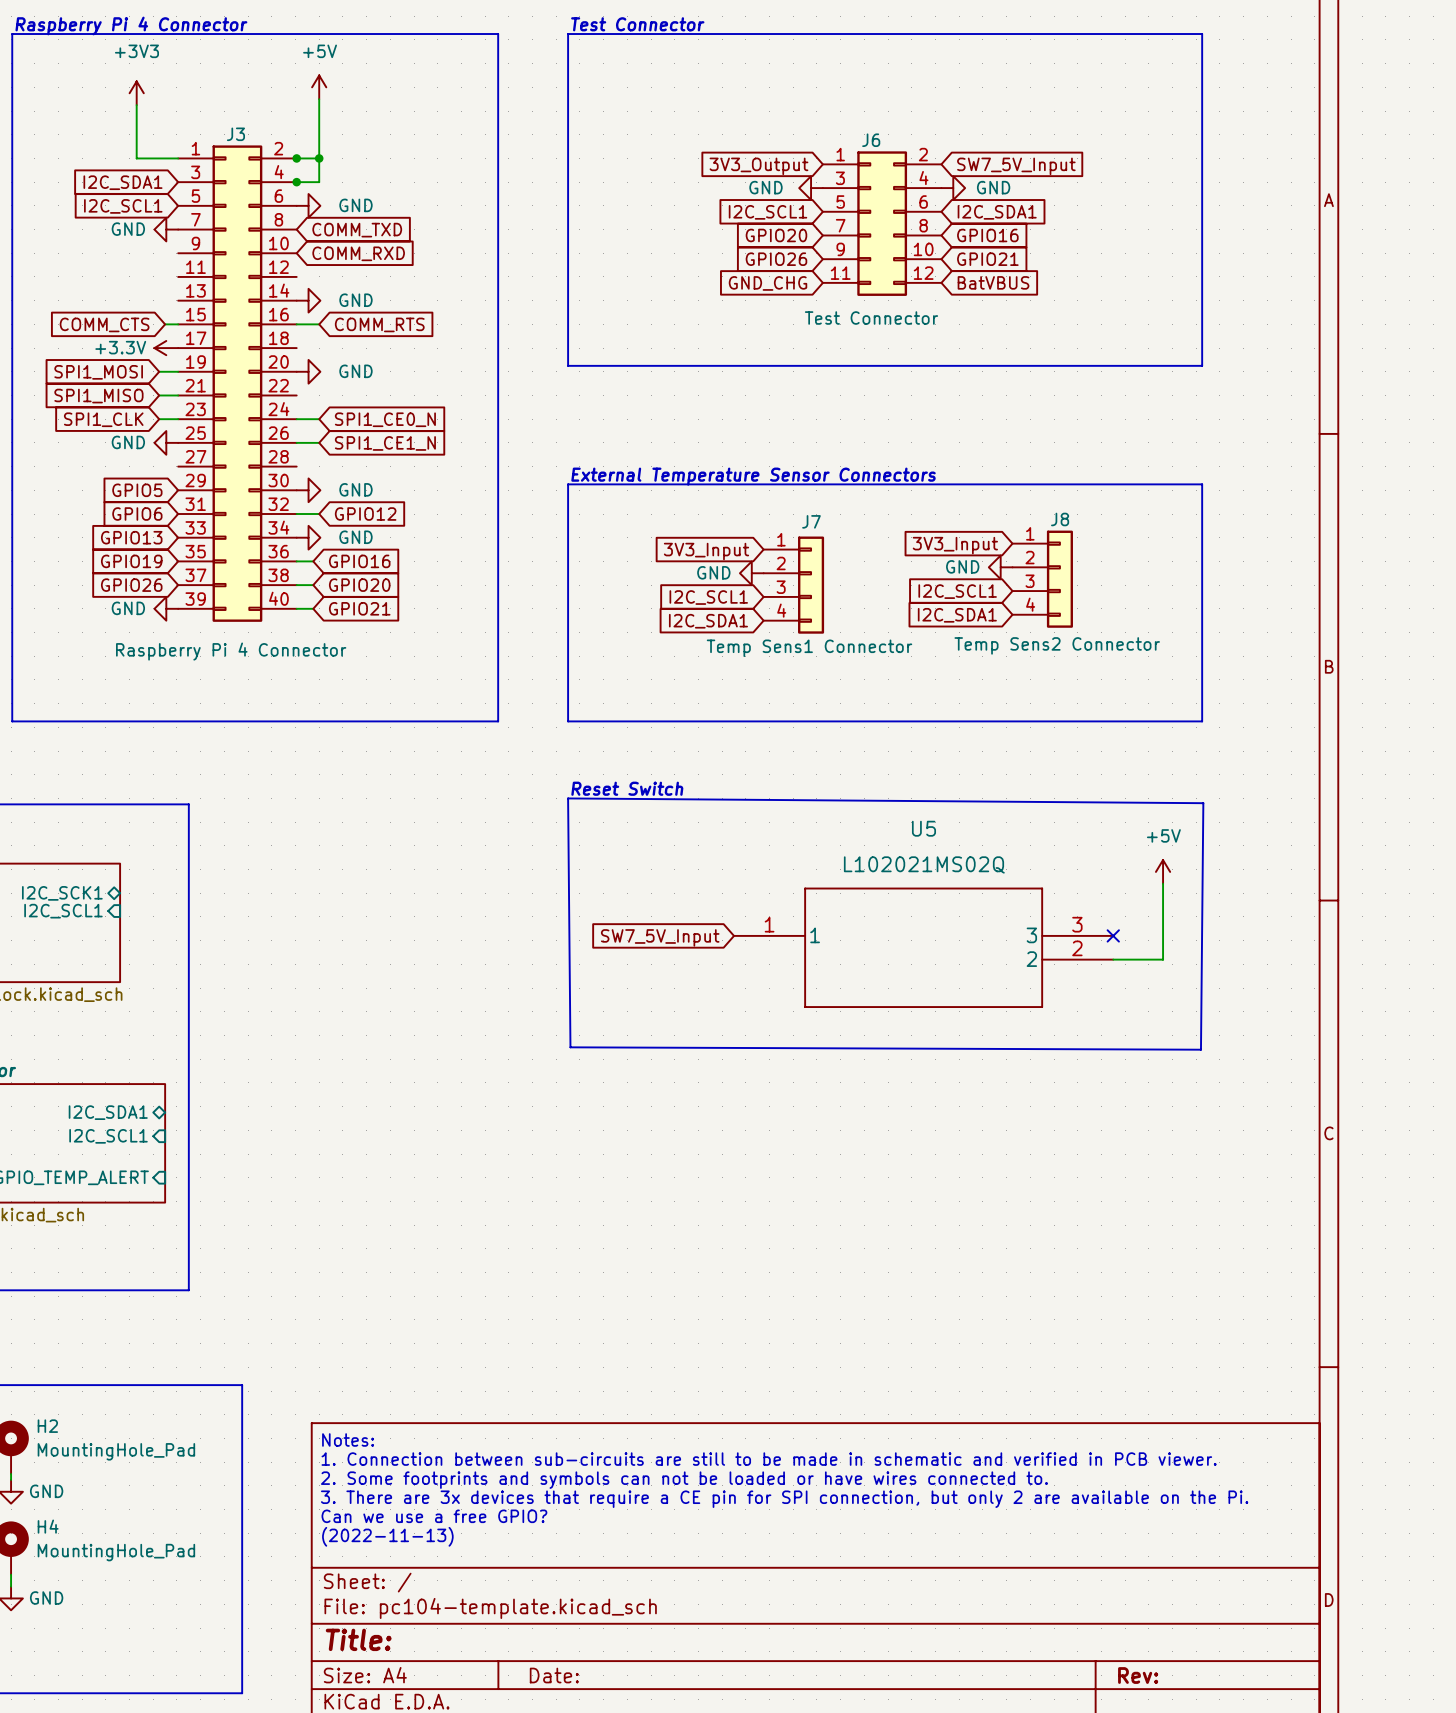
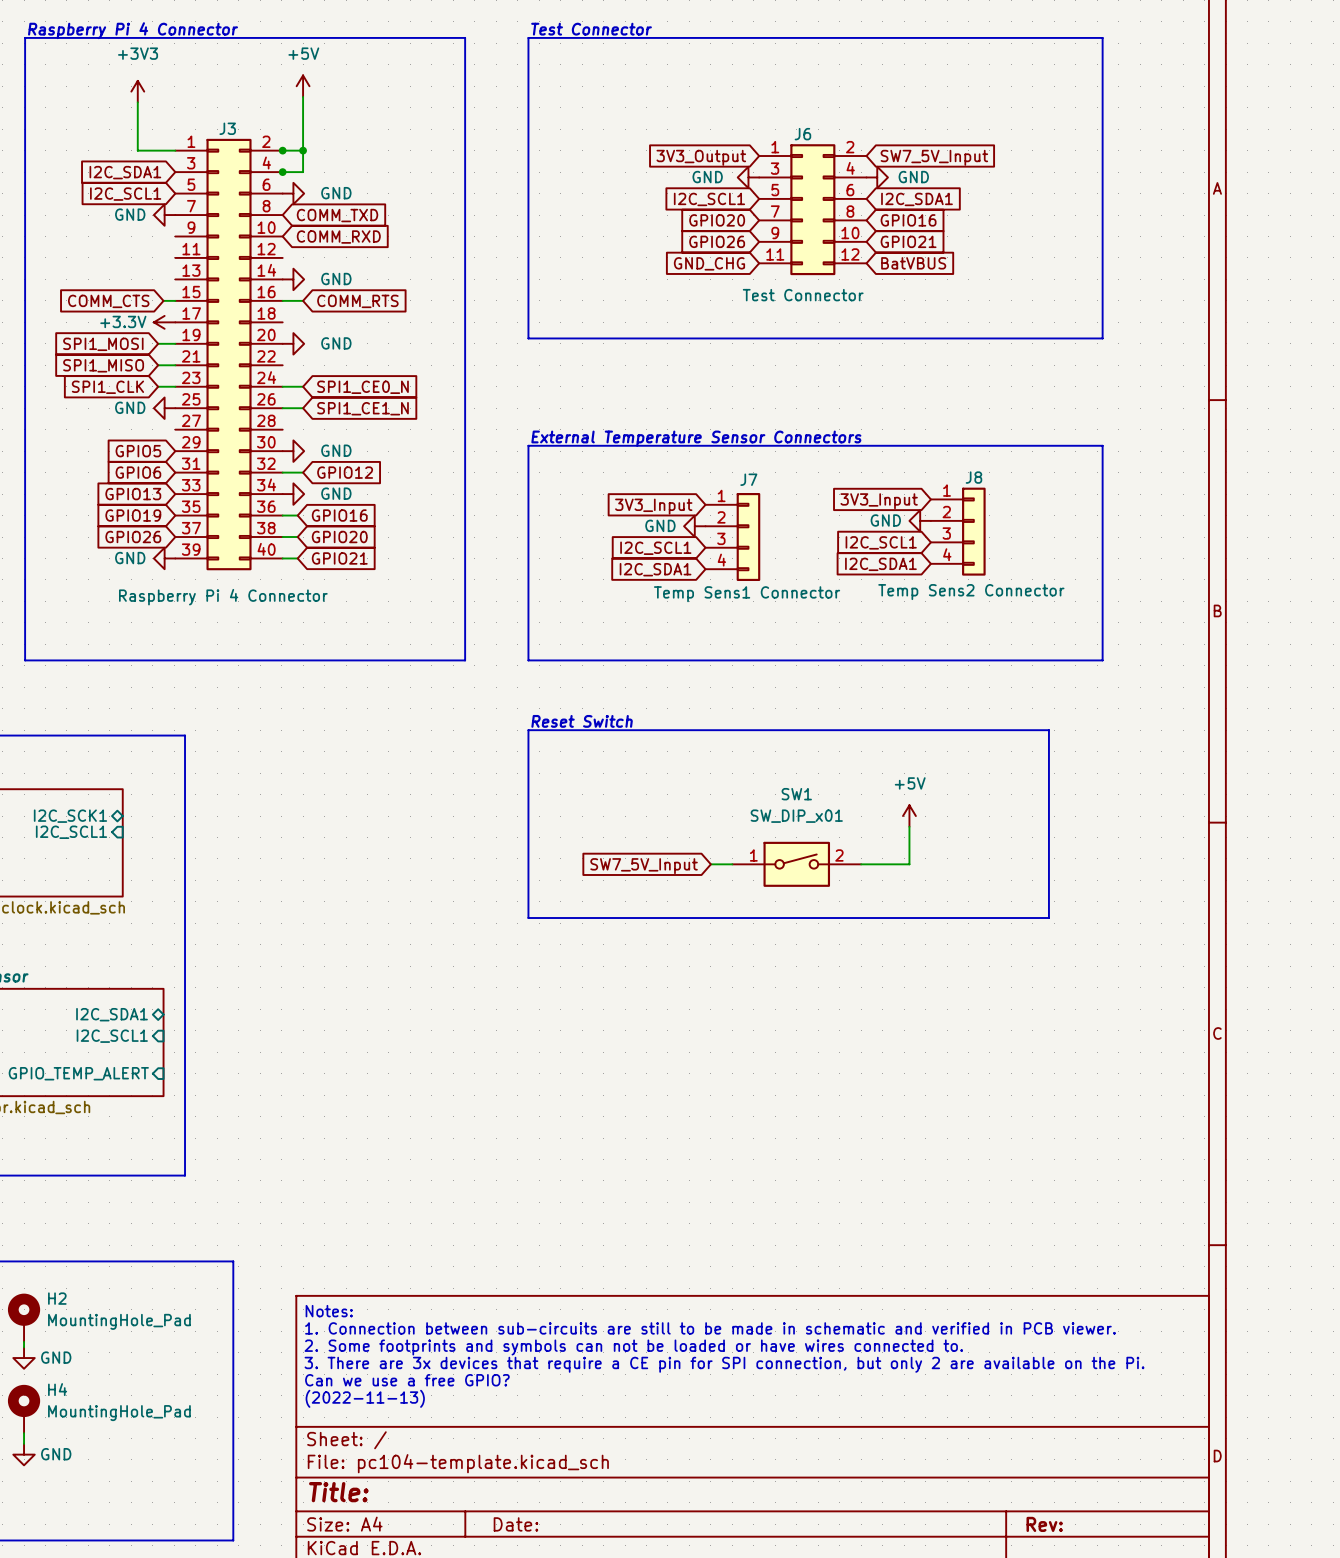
line: (568, 798) (1203, 803) (1200, 1049) (570, 1047) (568, 798) -> (528, 730) (528, 918) (1048, 918) (1048, 730) (528, 730)
power symbol position: +5V (1163, 871) -> +5V (909, 816)
wire: (1163, 883) (1163, 959) (1113, 959) -> none
wire: none -> (909, 826) (909, 864) (861, 864)
no-connect mark: (1113, 935) -> none
global label position: SW7_5V_Input (660, 937) -> SW7_5V_Input (644, 866)
wire: none -> (710, 864) (732, 864)
SW1: none -> SW_DIP_x01 (796, 864)
U5: L102021MS02Q (923, 947) -> none

